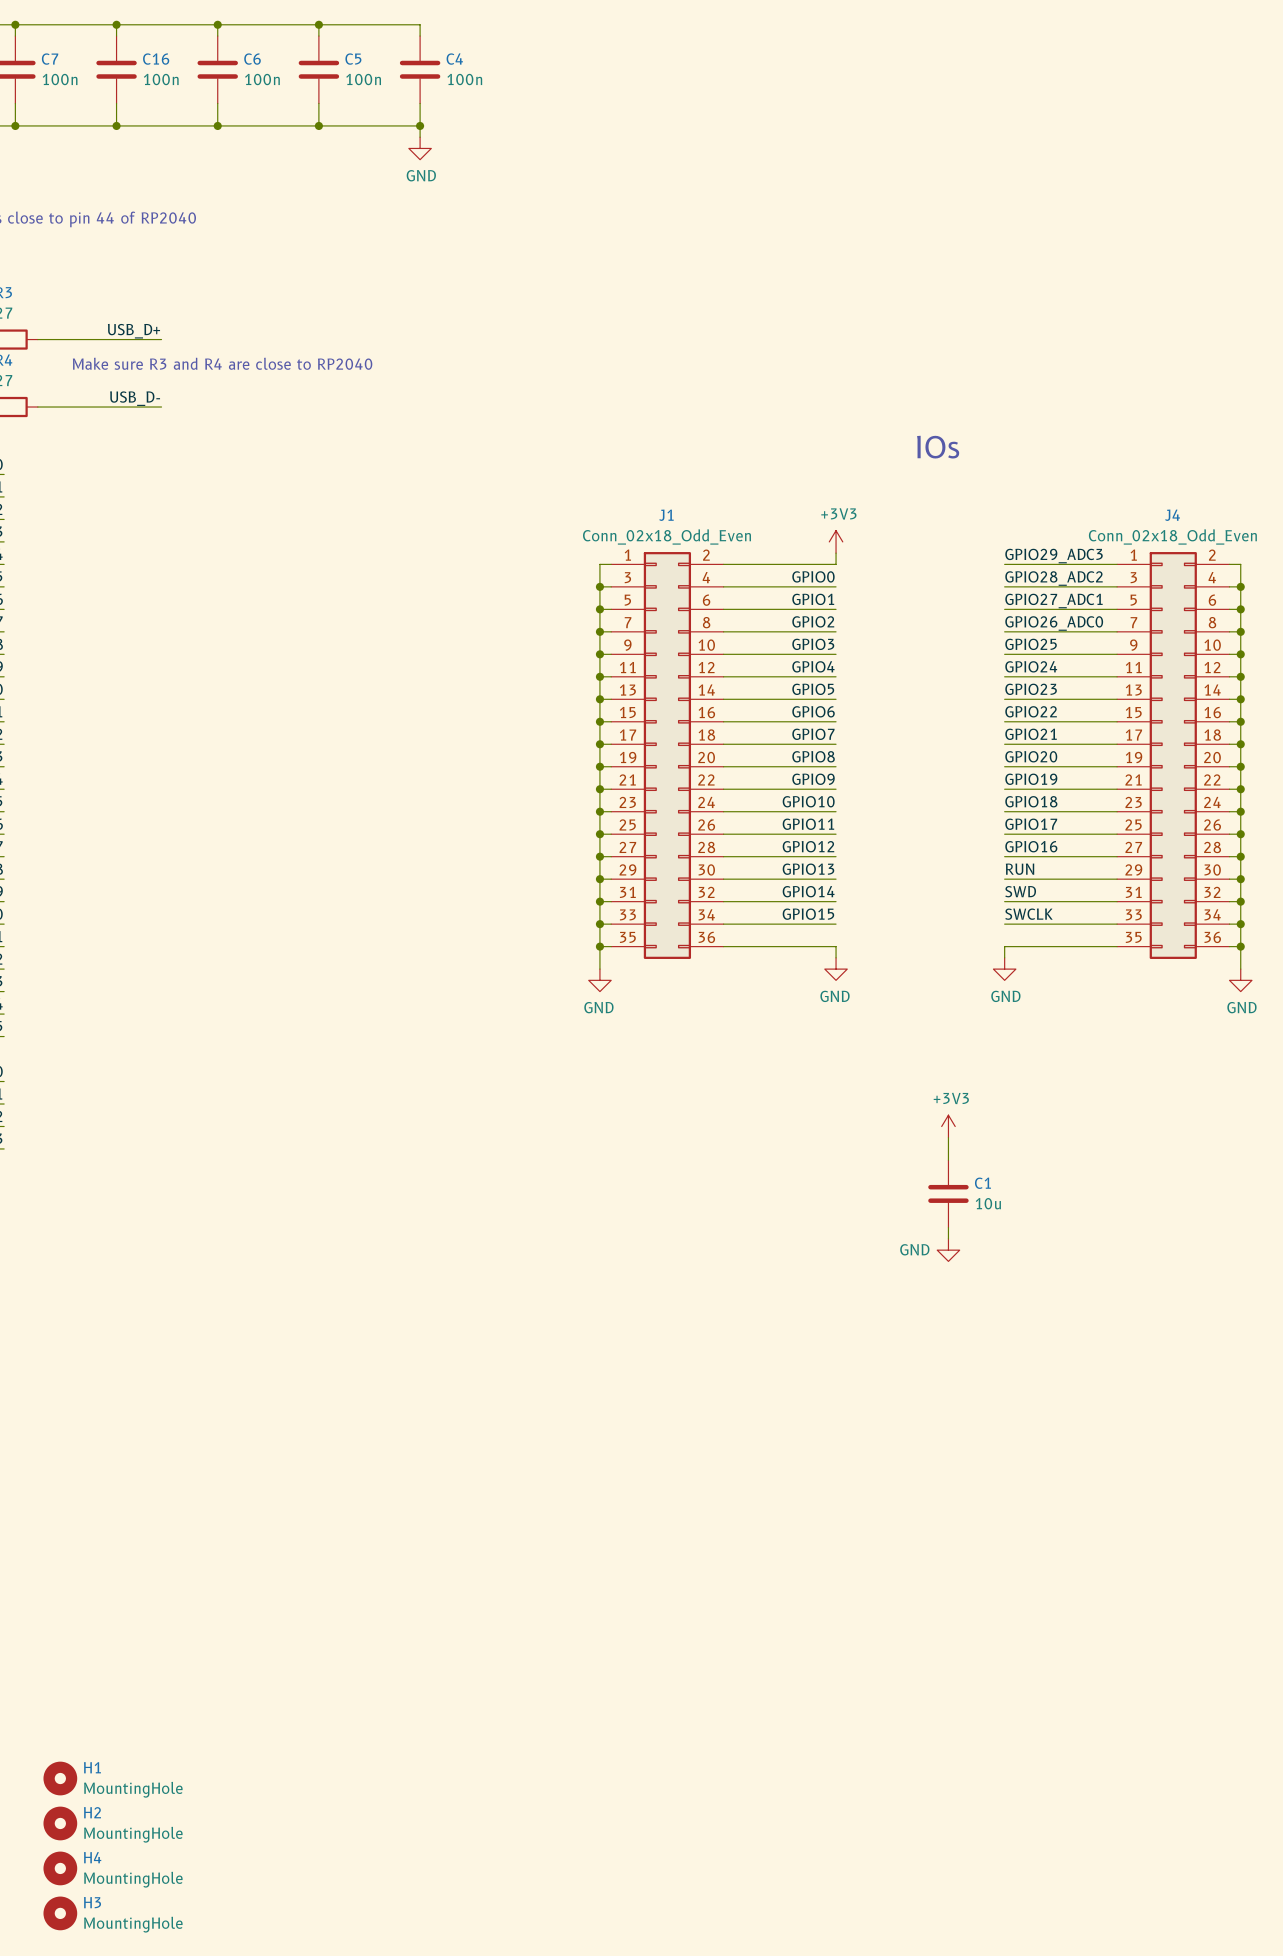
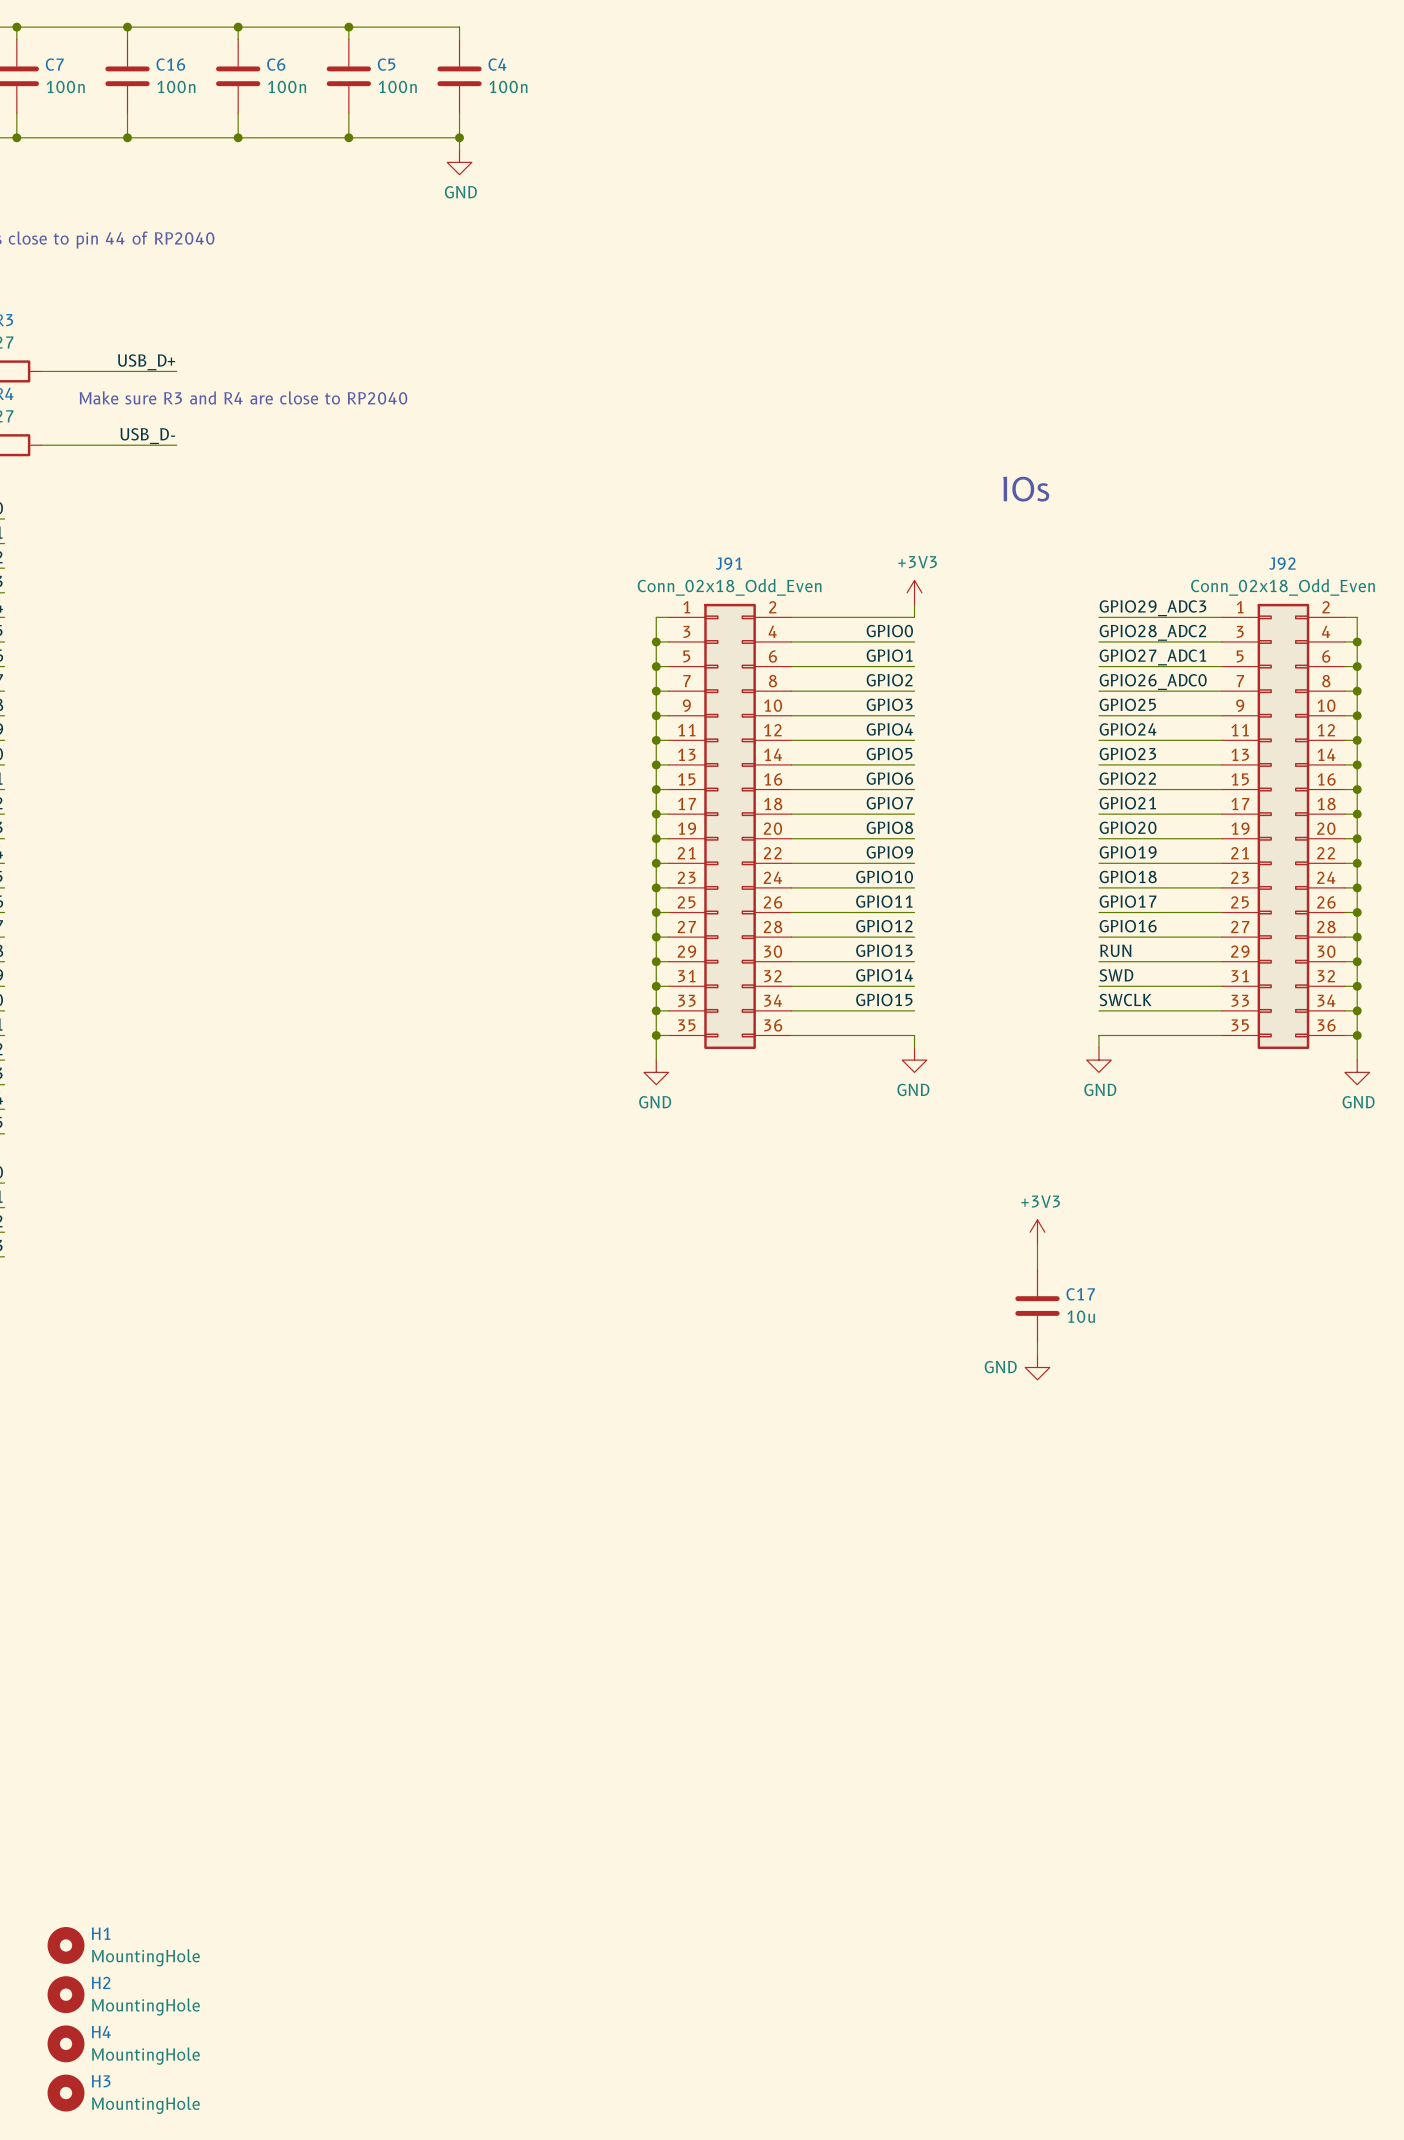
J1 name: J1 (666, 515) -> J91 (729, 563)
J4 name: J4 (1172, 515) -> J92 (1282, 563)
C1 name: C1 (982, 1183) -> C17 (1080, 1294)

